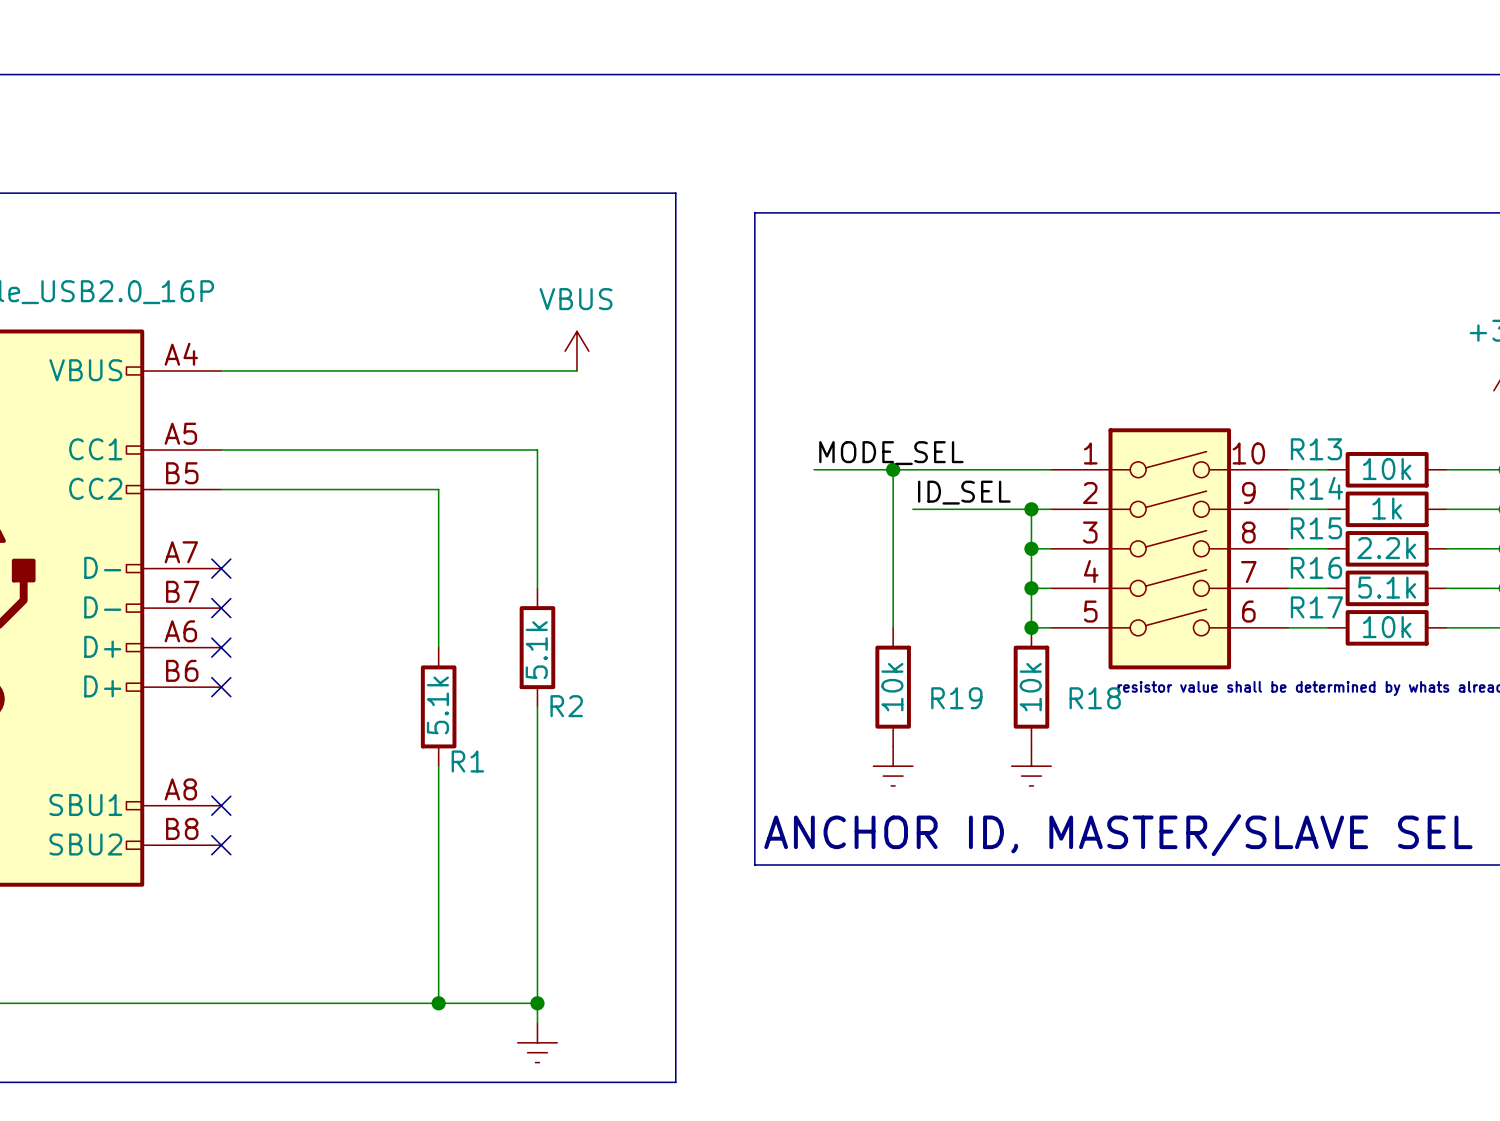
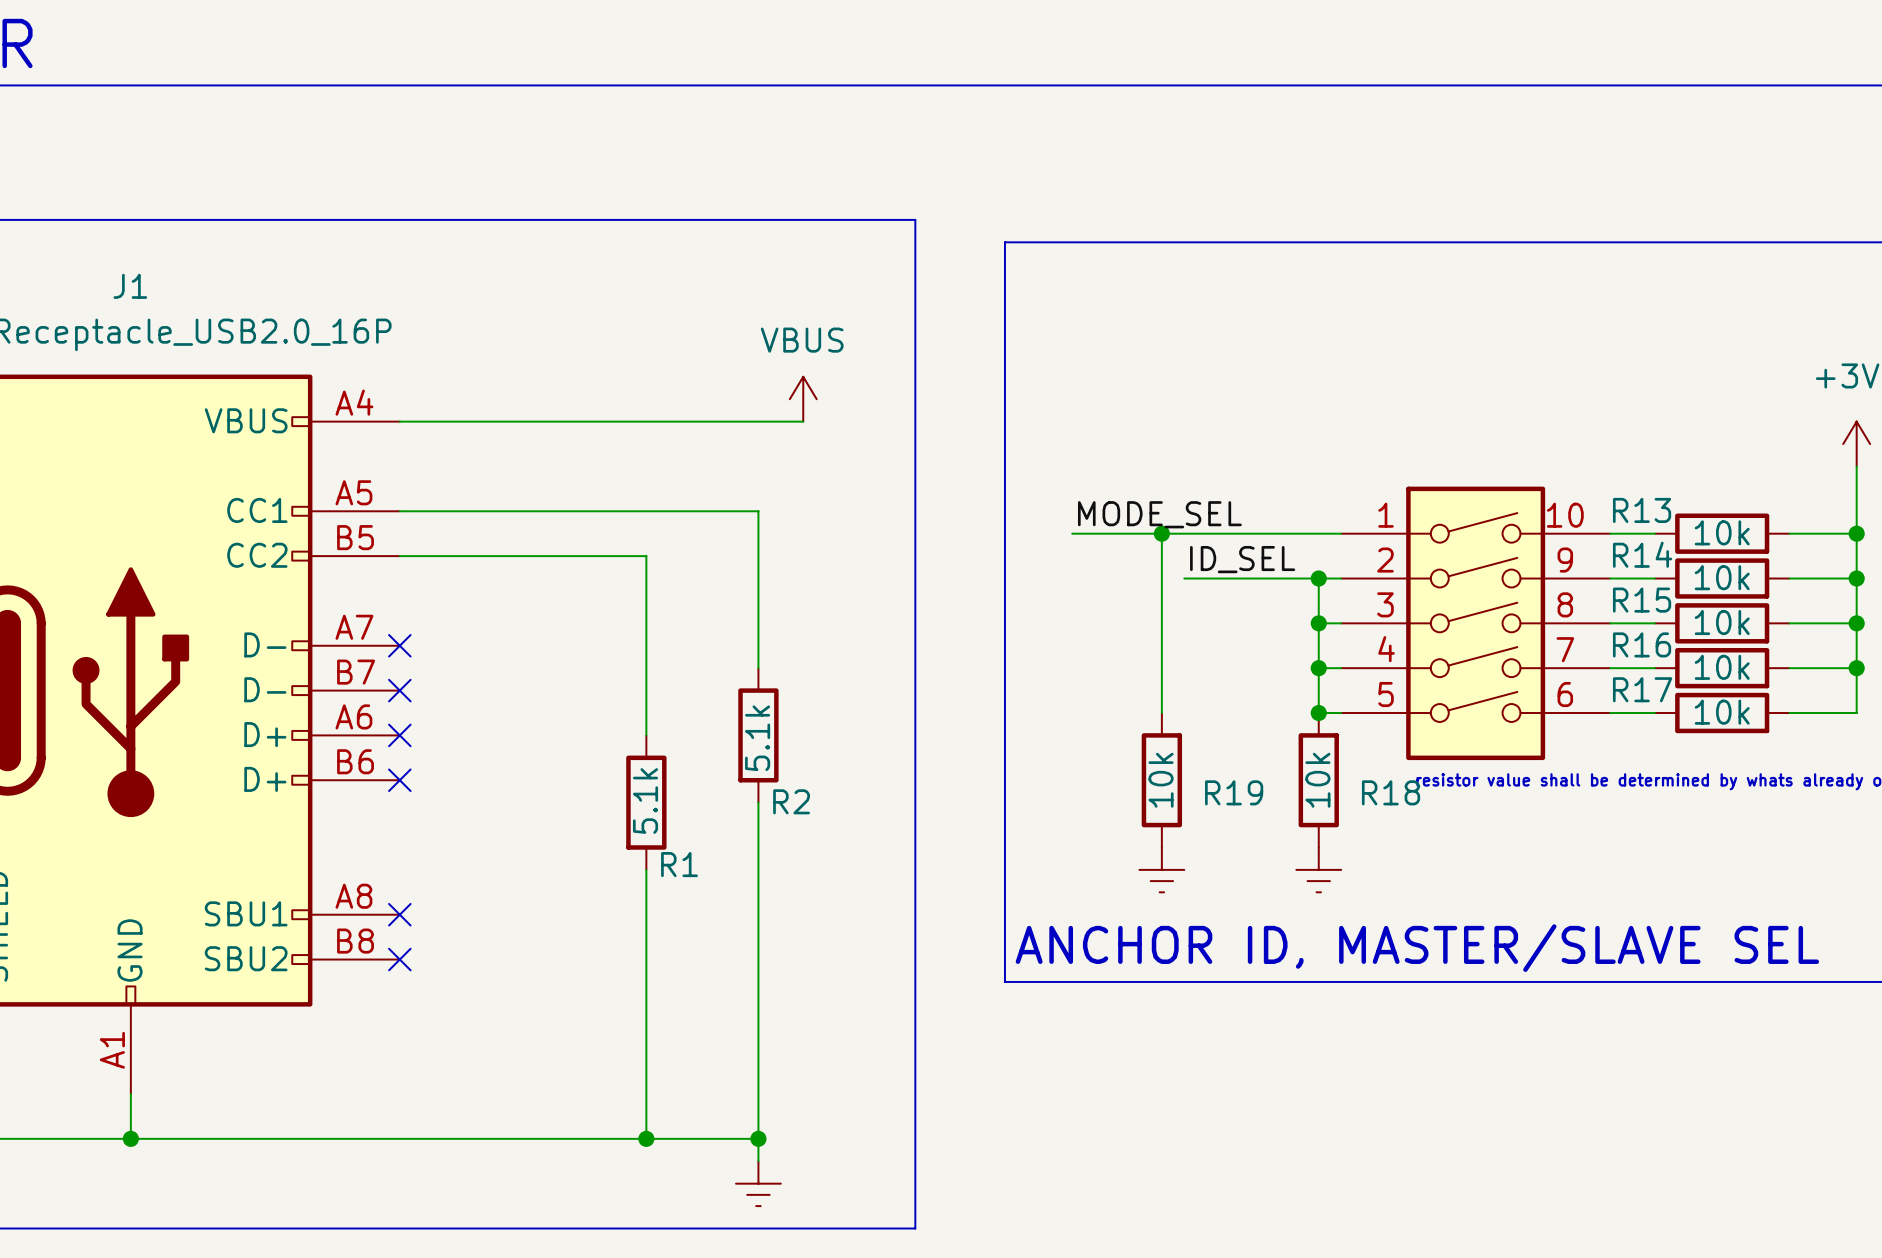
R14 value: 1k (1387, 508) -> 10k (1722, 577)
R15 value: 2.2k (1386, 548) -> 10k (1722, 622)
R16 value: 5.1k (1387, 587) -> 10k (1722, 667)

